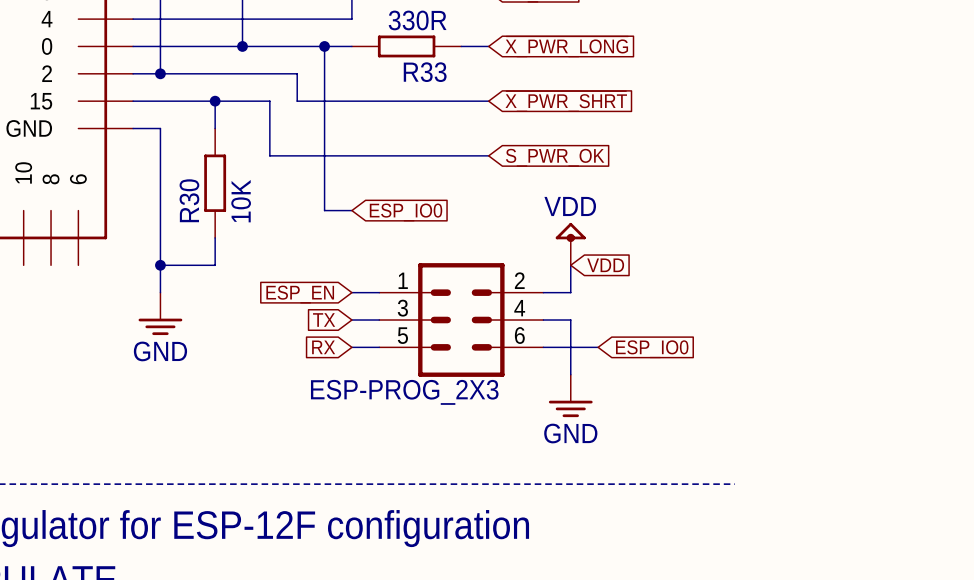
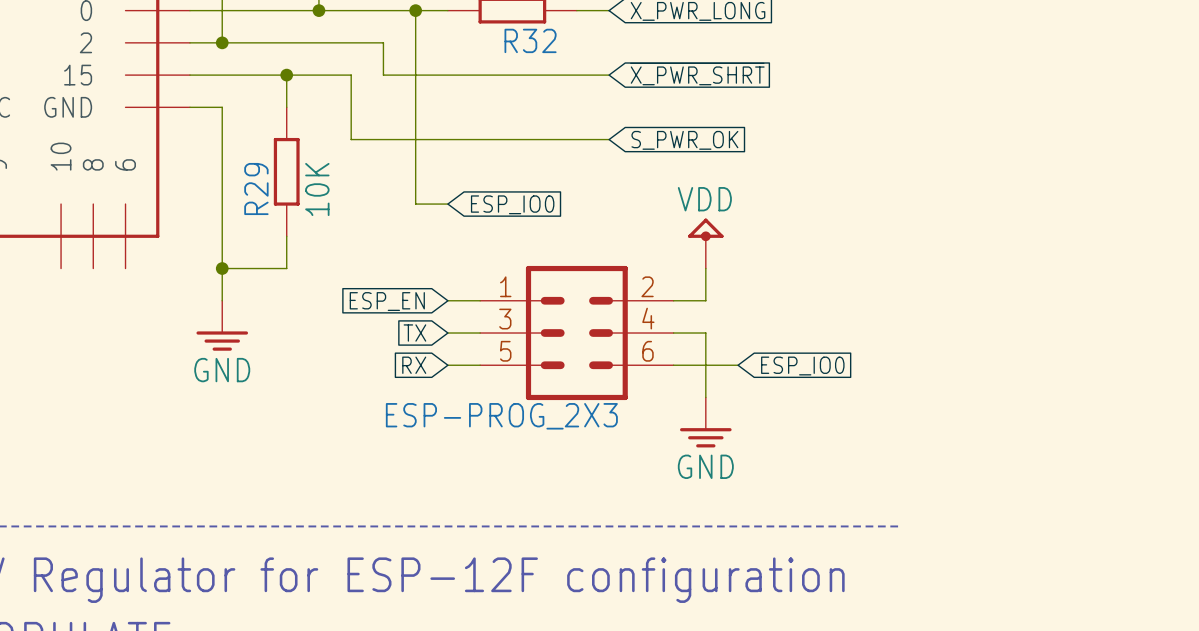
R33 name: R33 (425, 72) -> R32 (530, 40)
R30 name: R30 (189, 200) -> R29 (256, 189)
global label: VDD (605, 265) -> none

